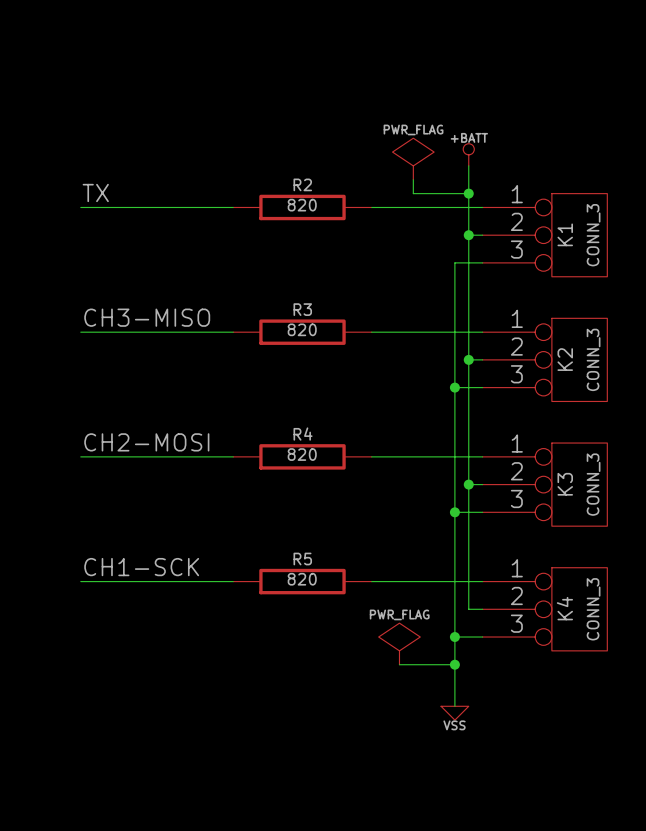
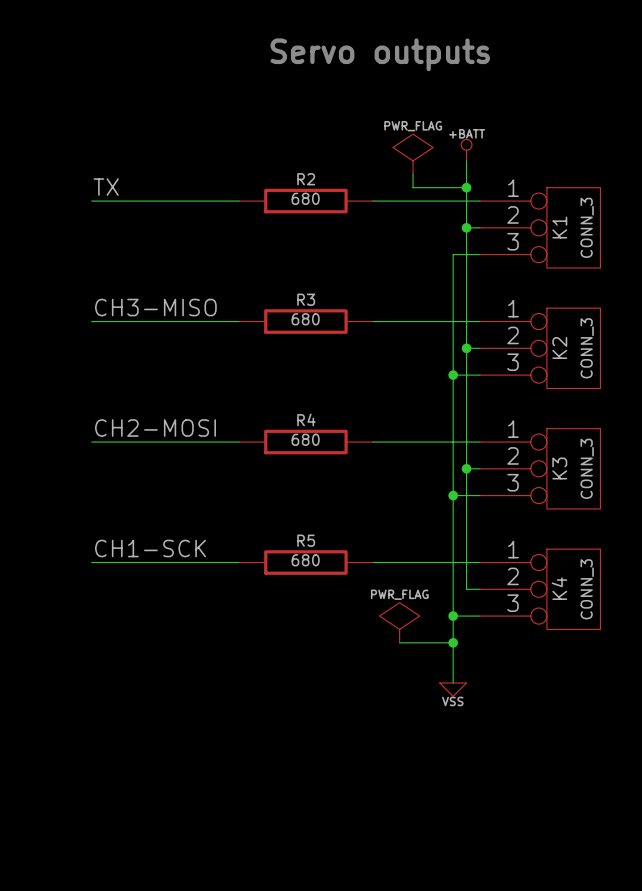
text: none -> Servo outputs (380, 54)
R2 value: 820 (302, 205) -> 680 (305, 198)
R3 value: 820 (302, 329) -> 680 (305, 319)
R4 value: 820 (302, 454) -> 680 (305, 439)
R5 value: 820 (302, 579) -> 680 (305, 560)

